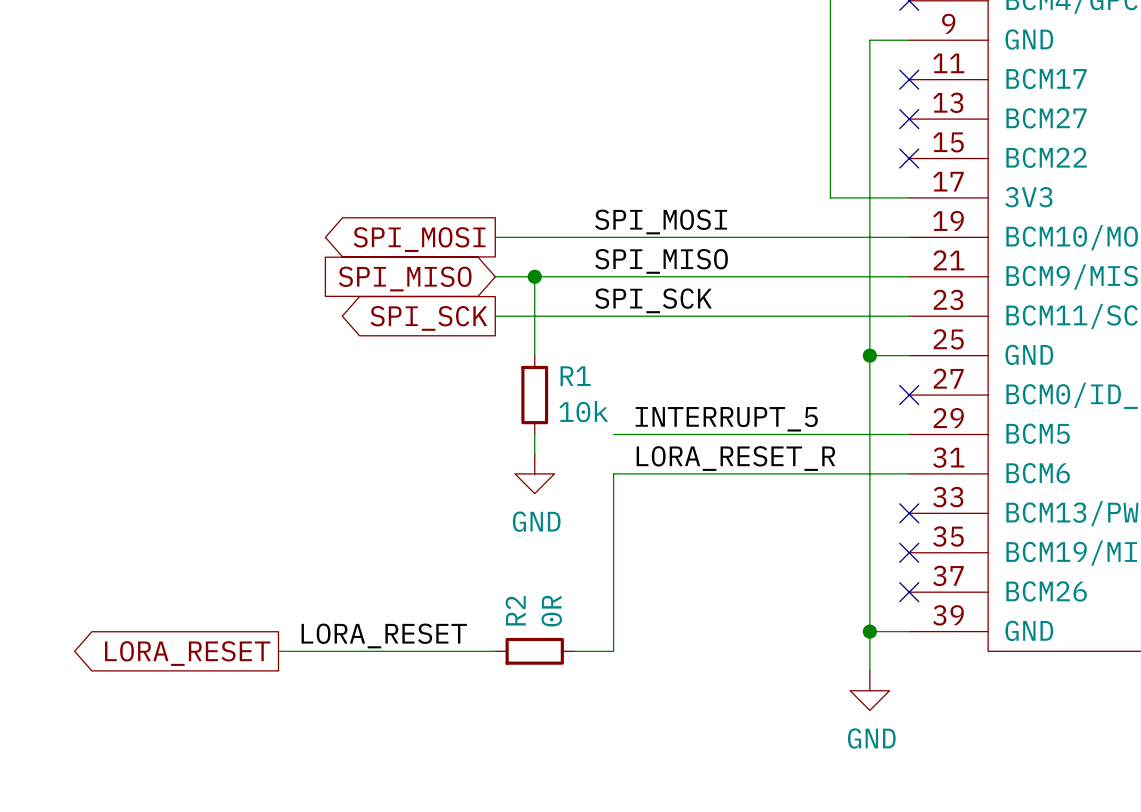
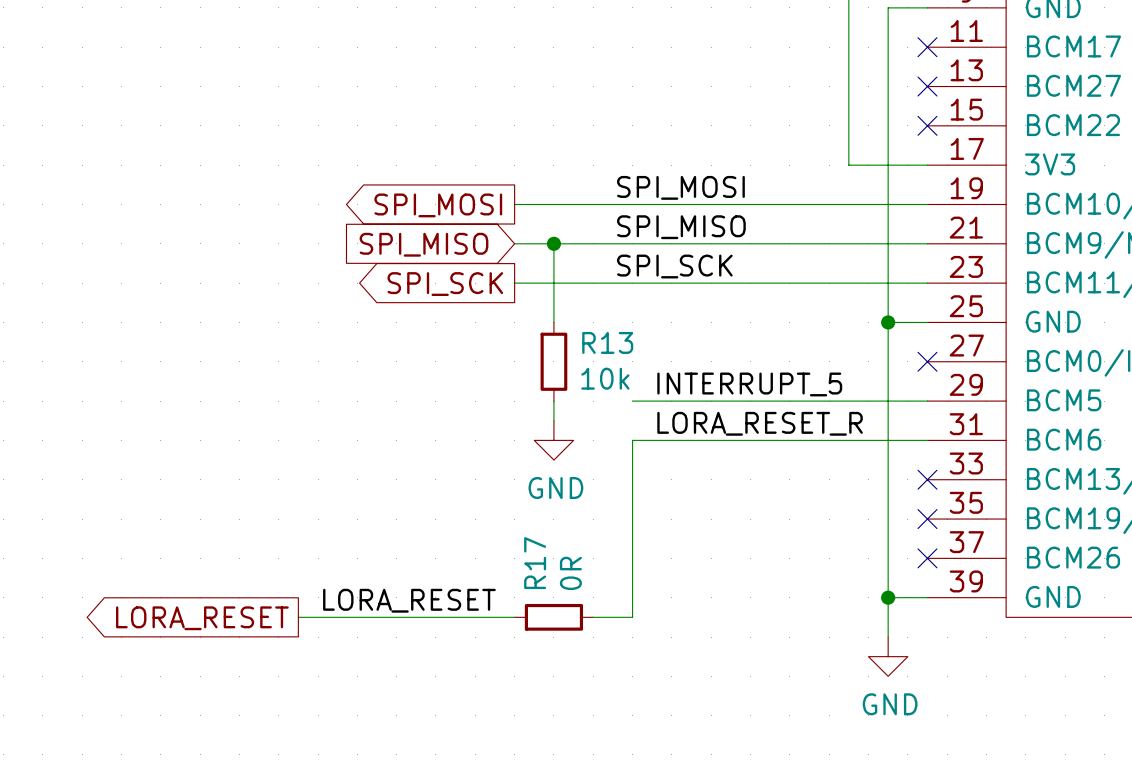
R1 name: R1 (575, 376) -> R13 (607, 342)
R2 name: R2 (515, 610) -> R17 (535, 563)

